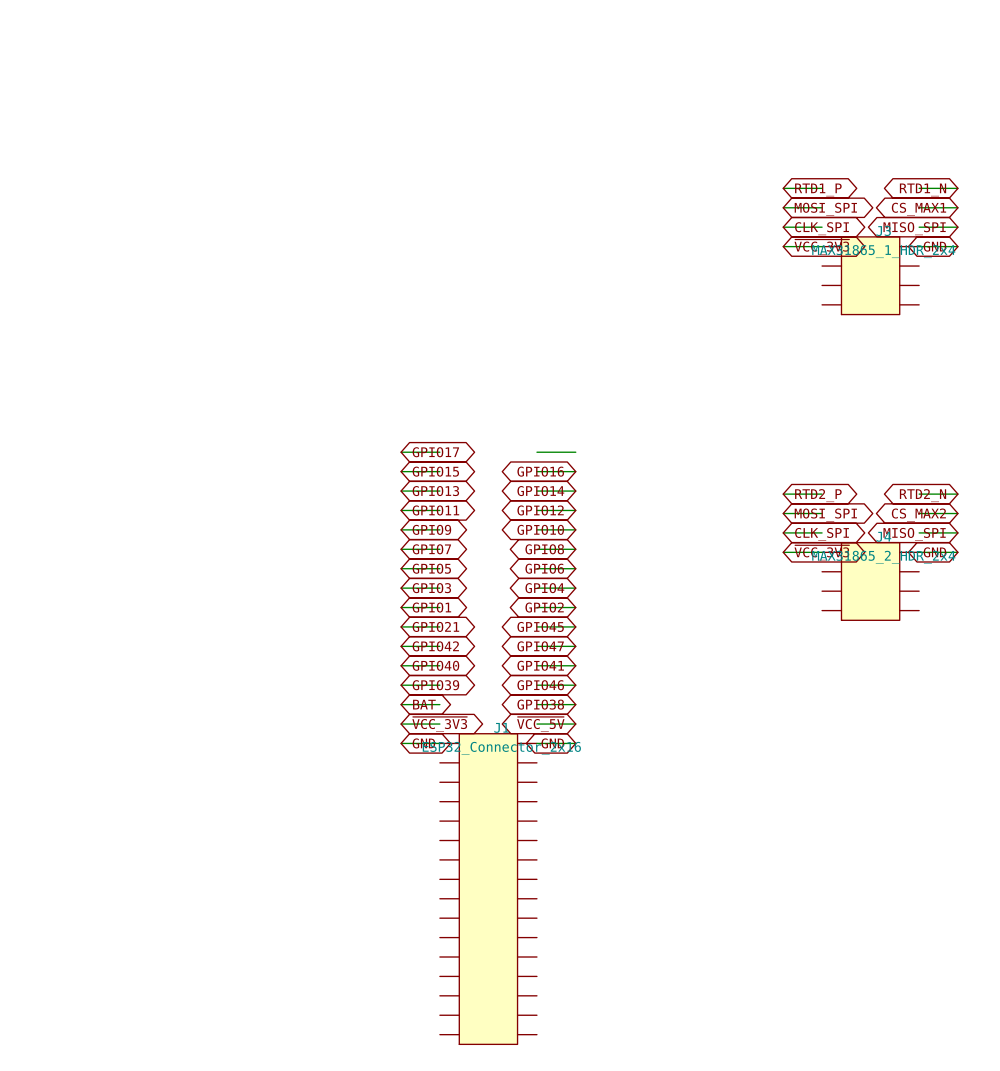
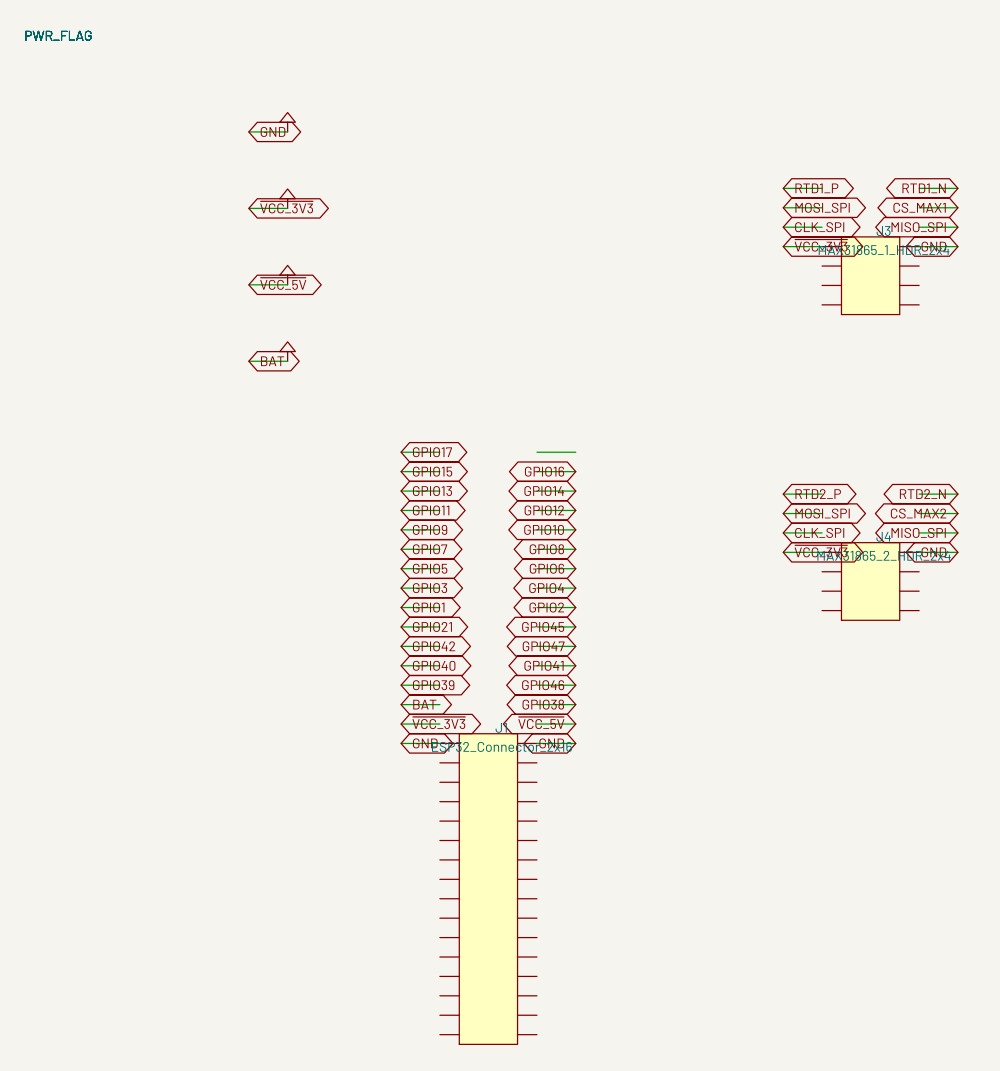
power symbol: none -> PWR_FLAG (287, 122)
wire: none -> (248, 131) (287, 131)
global label: none -> GND (273, 131)
power symbol: none -> PWR_FLAG (287, 198)
wire: none -> (248, 208) (287, 208)
global label: none -> ~{VCC_3V3} (286, 207)
power symbol: none -> PWR_FLAG (287, 275)
wire: none -> (248, 284) (287, 284)
global label: none -> ~{VCC_5V} (283, 283)
power symbol: none -> PWR_FLAG (287, 351)
wire: none -> (248, 361) (287, 361)
global label: none -> BAT (272, 361)

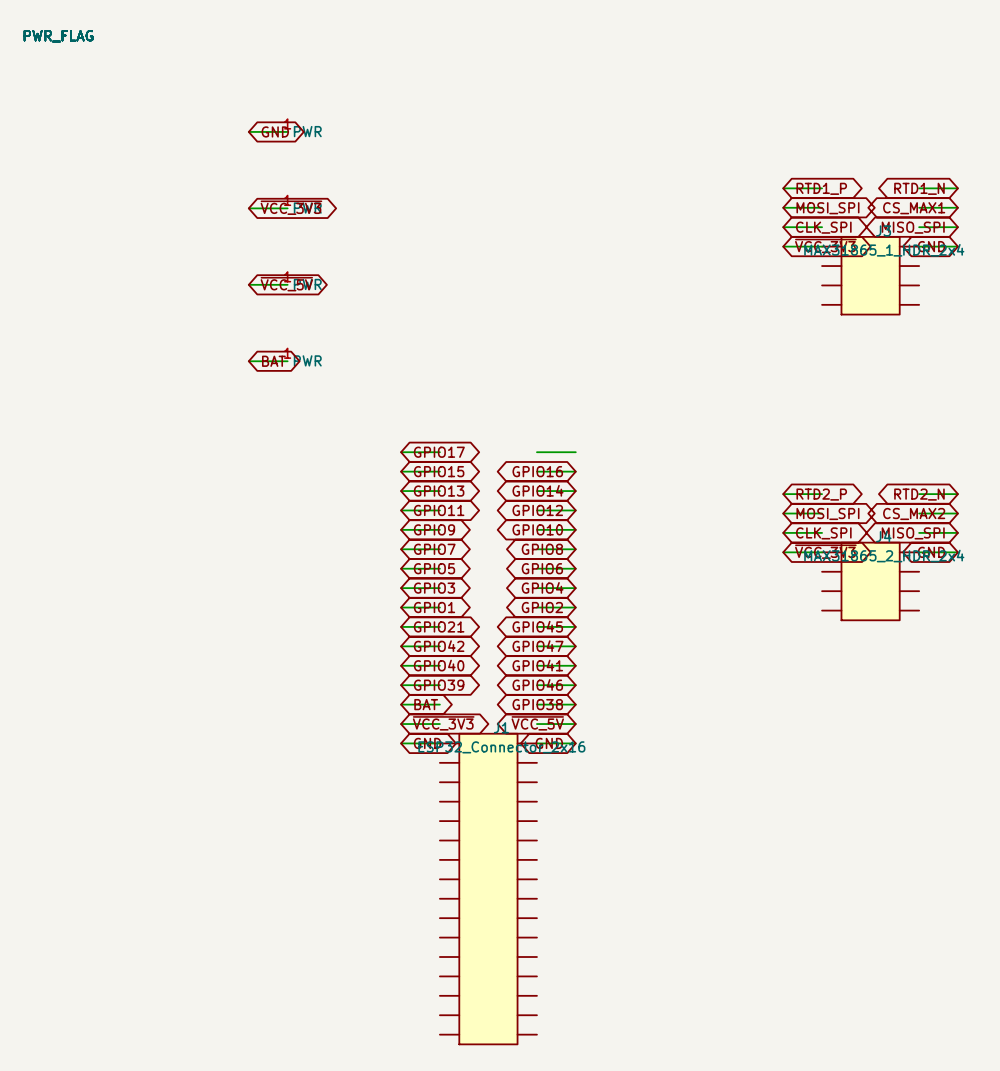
power symbol: none -> PWR_FLAG (172, 83)
power symbol: none -> PWR_FLAG (172, 121)
power symbol: PWR_FLAG (287, 122) -> none
power symbol: none -> PWR_FLAG (172, 160)
power symbol: none -> PWR_FLAG (172, 198)
power symbol: PWR_FLAG (287, 198) -> none
power symbol: PWR_FLAG (287, 275) -> none
power symbol: PWR_FLAG (287, 351) -> none

